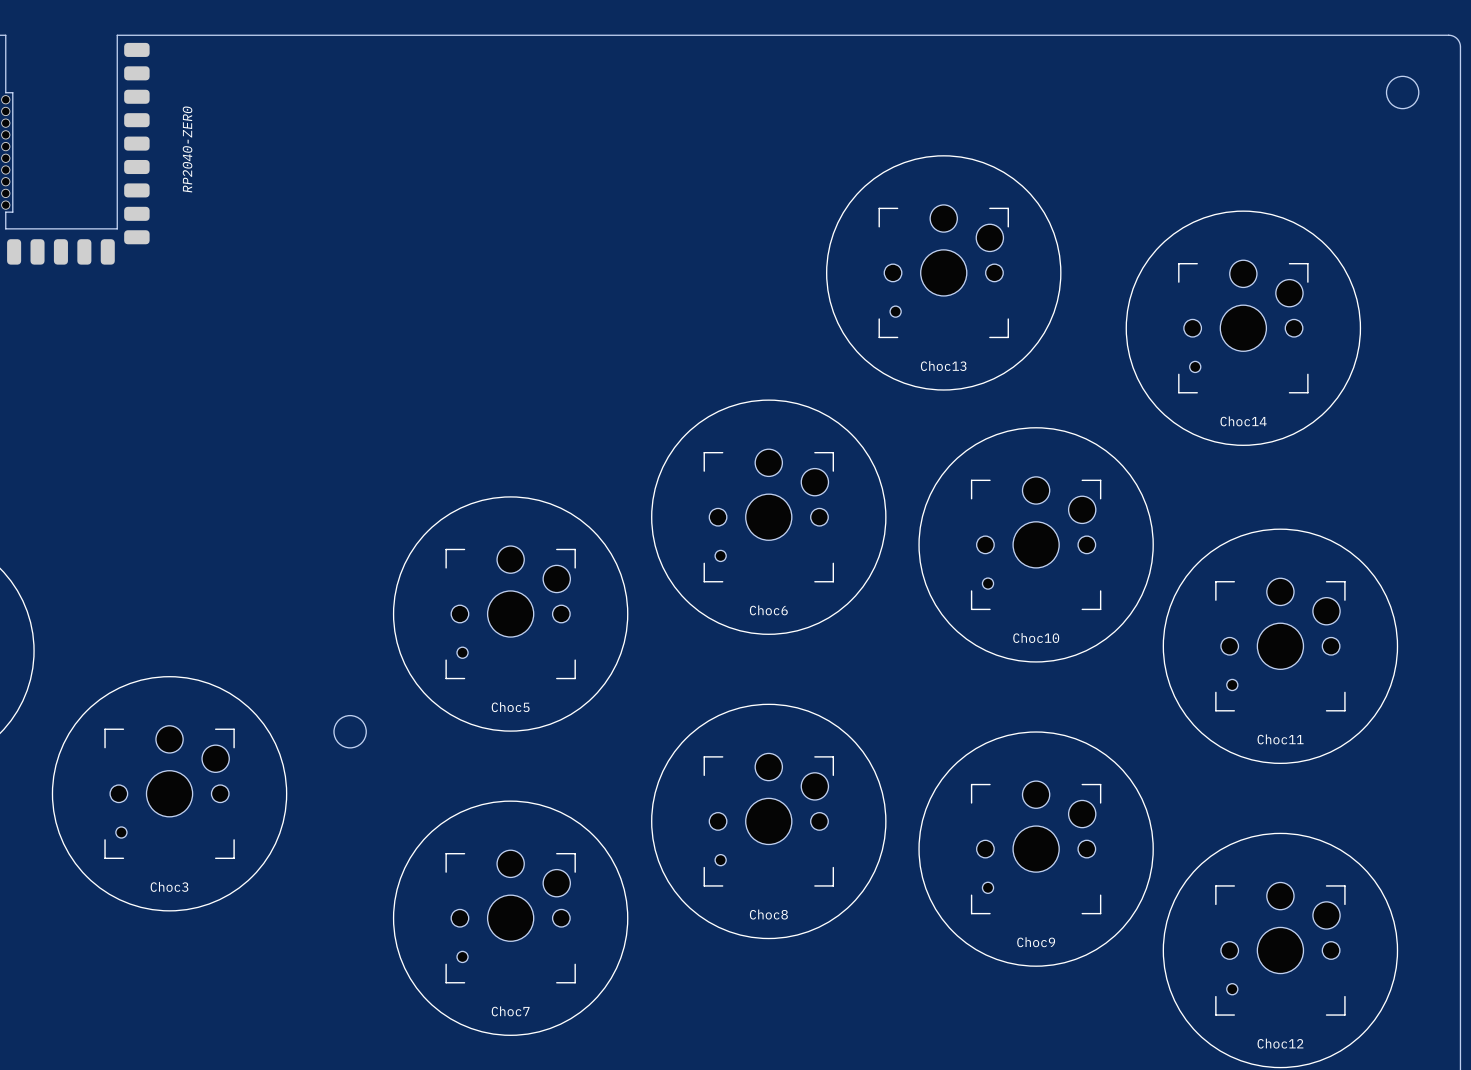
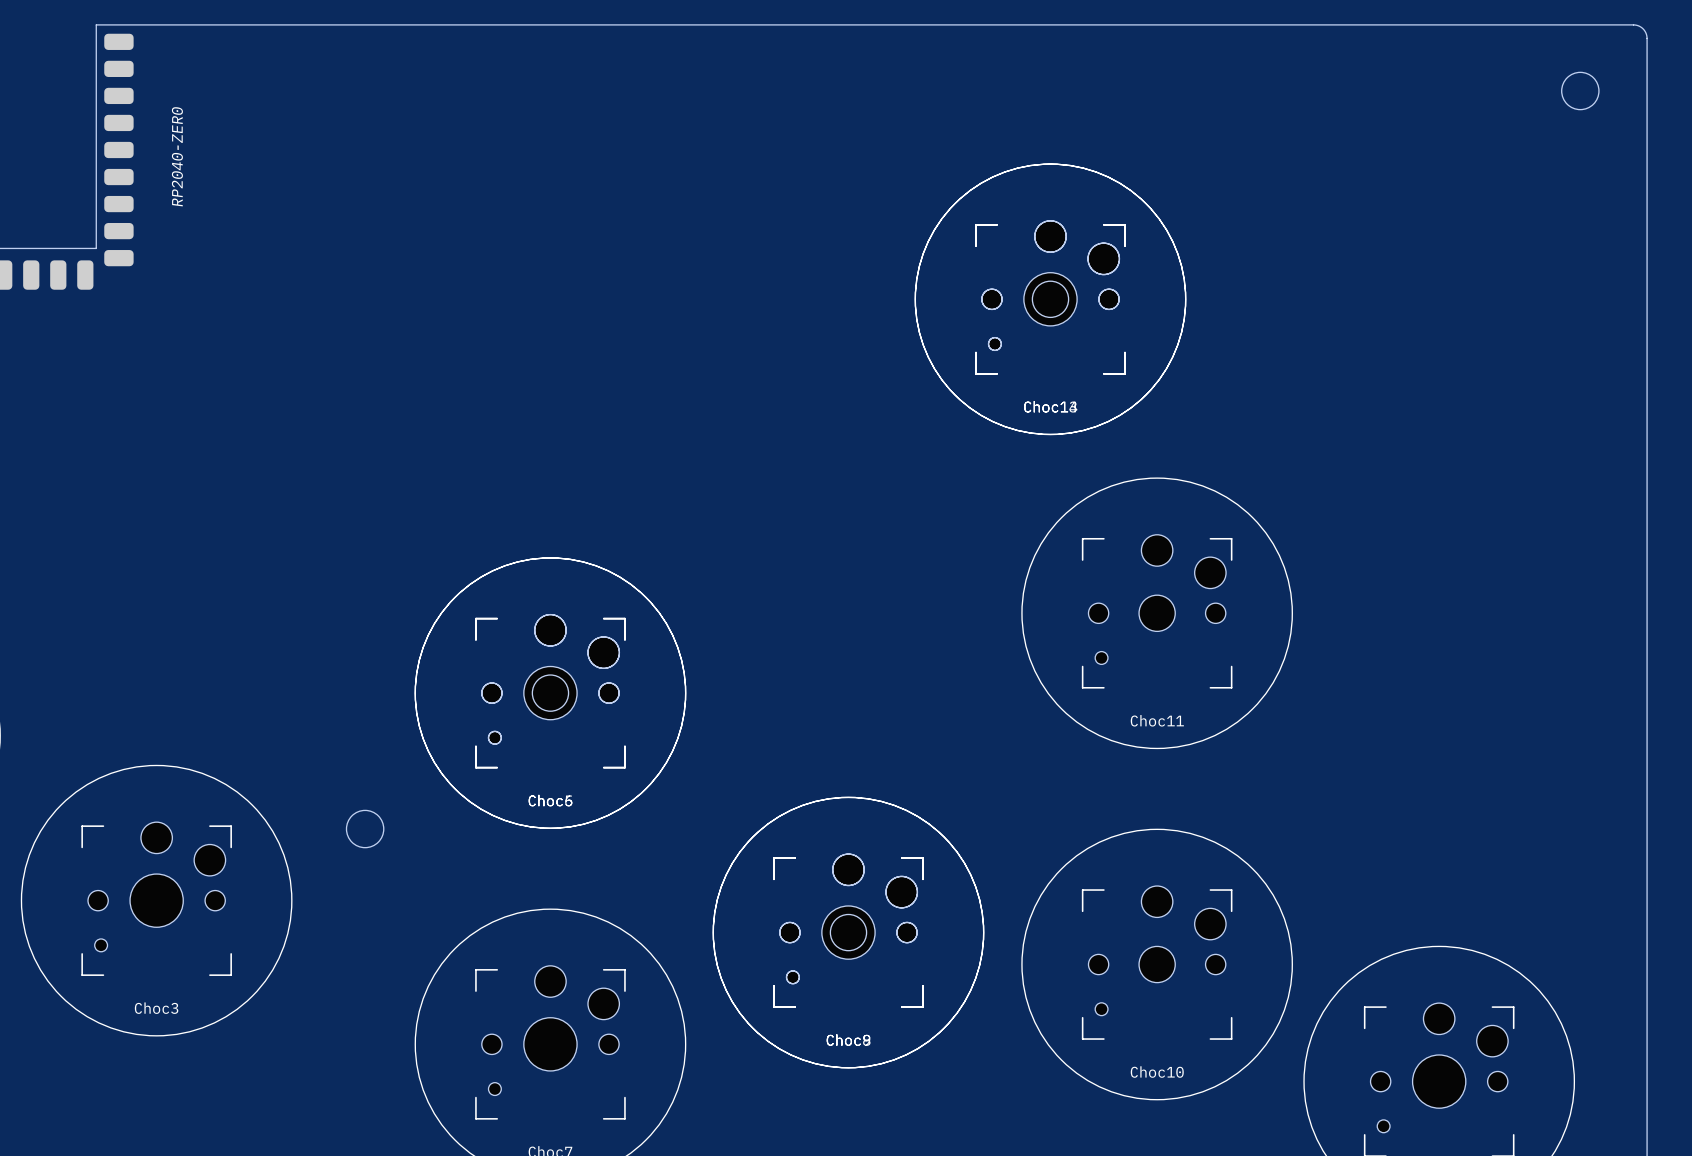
Choc14 footprint: [1125, 210, 1361, 446] -> [914, 163, 1187, 436]
Choc6 footprint: [651, 399, 887, 635] -> [414, 557, 687, 829]
Choc10 footprint: [918, 427, 1154, 663] -> [1021, 828, 1293, 1101]
Choc11 footprint: [1162, 528, 1398, 764] -> [1021, 477, 1293, 749]
Choc9 footprint: [918, 731, 1154, 967] -> [712, 796, 985, 1069]

